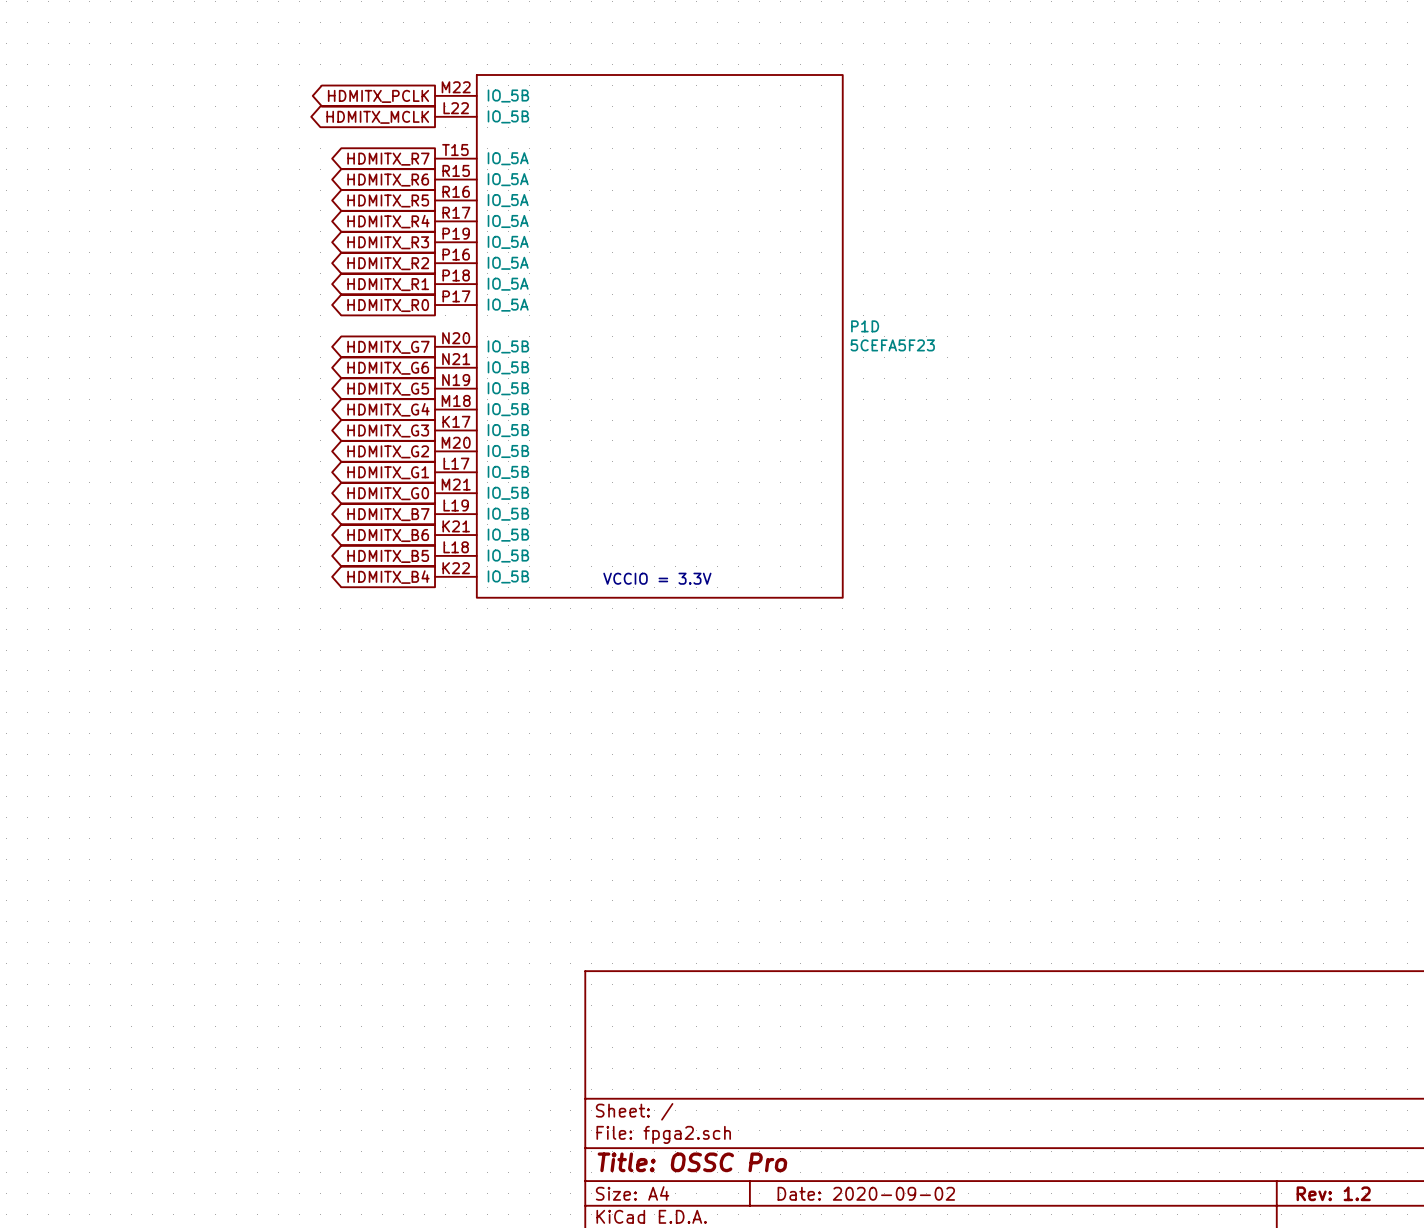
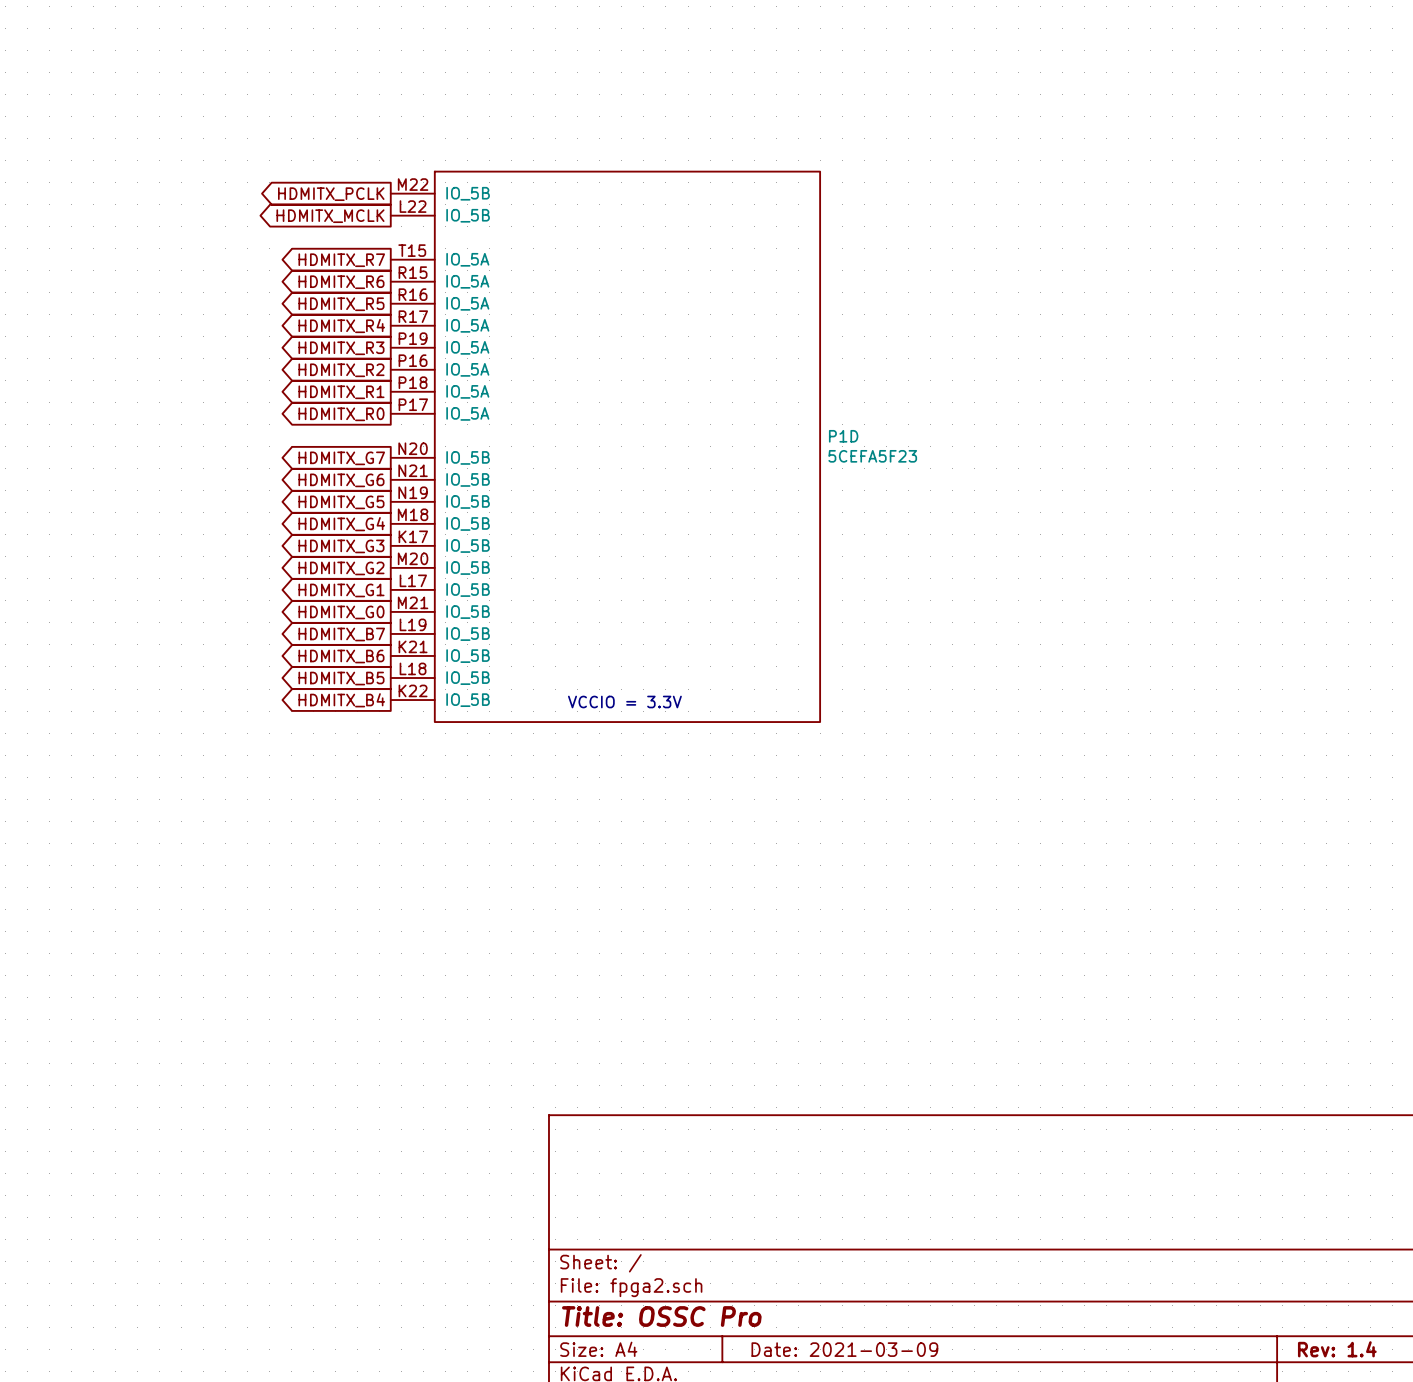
title block: Date: 2020-09-02 (866, 1193) -> Date: 2021-03-09 (844, 1349)
title block: Rev: 1.2 (1333, 1193) -> Rev: 1.4 (1337, 1349)

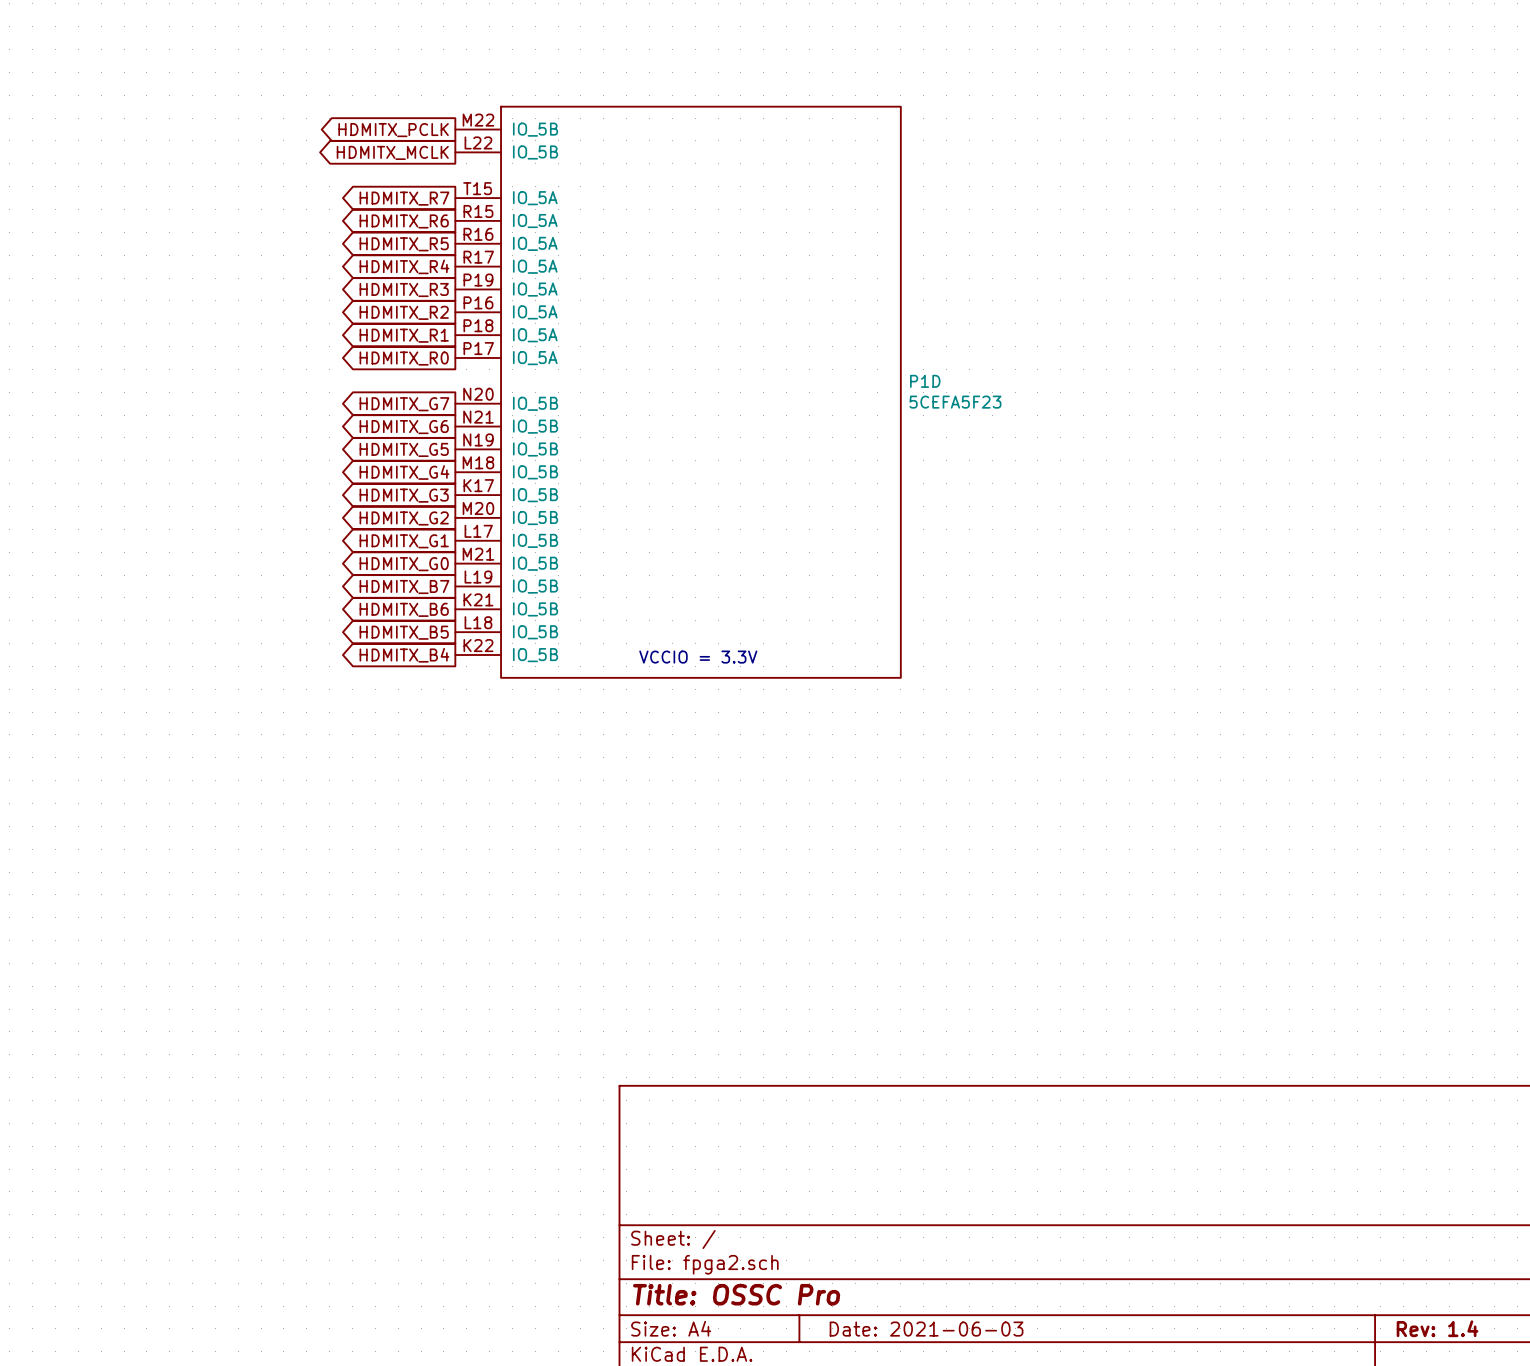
title block: Date: 2021-03-09 (844, 1349) -> Date: 2021-06-03 (926, 1329)

